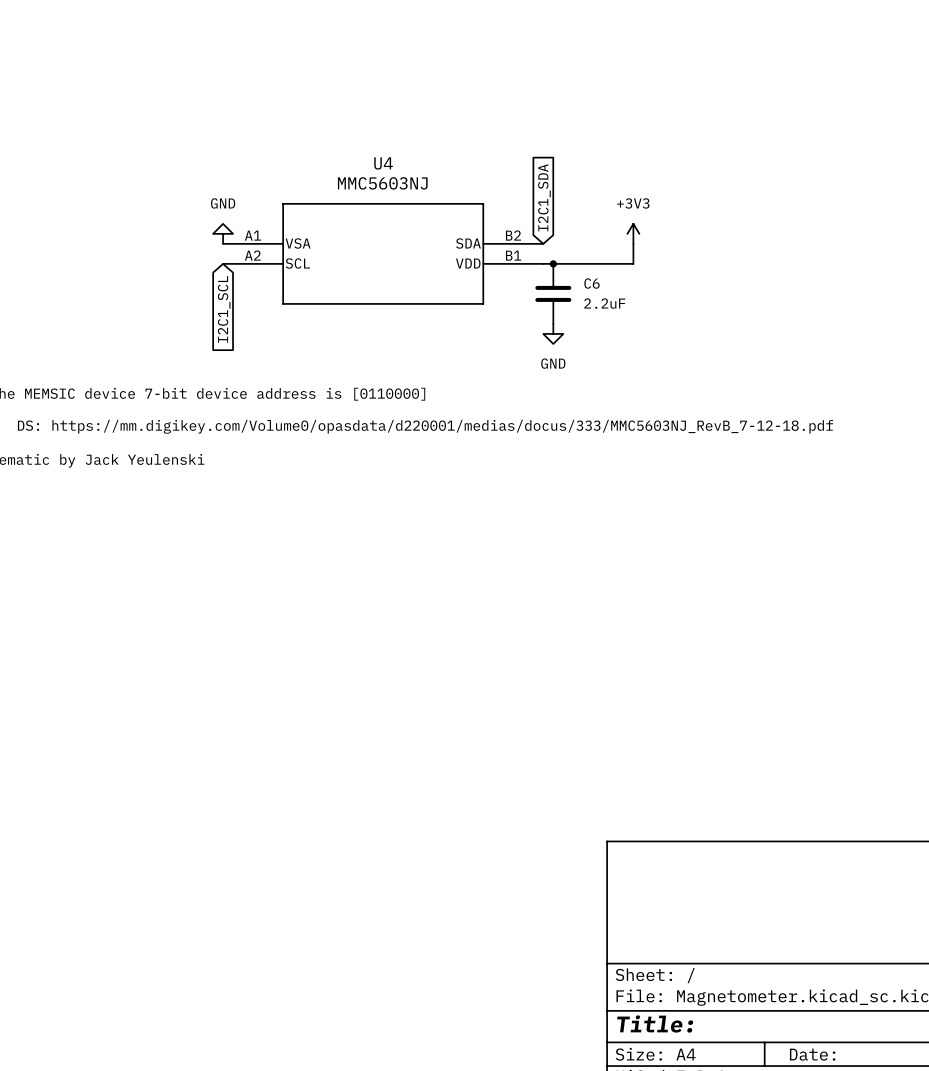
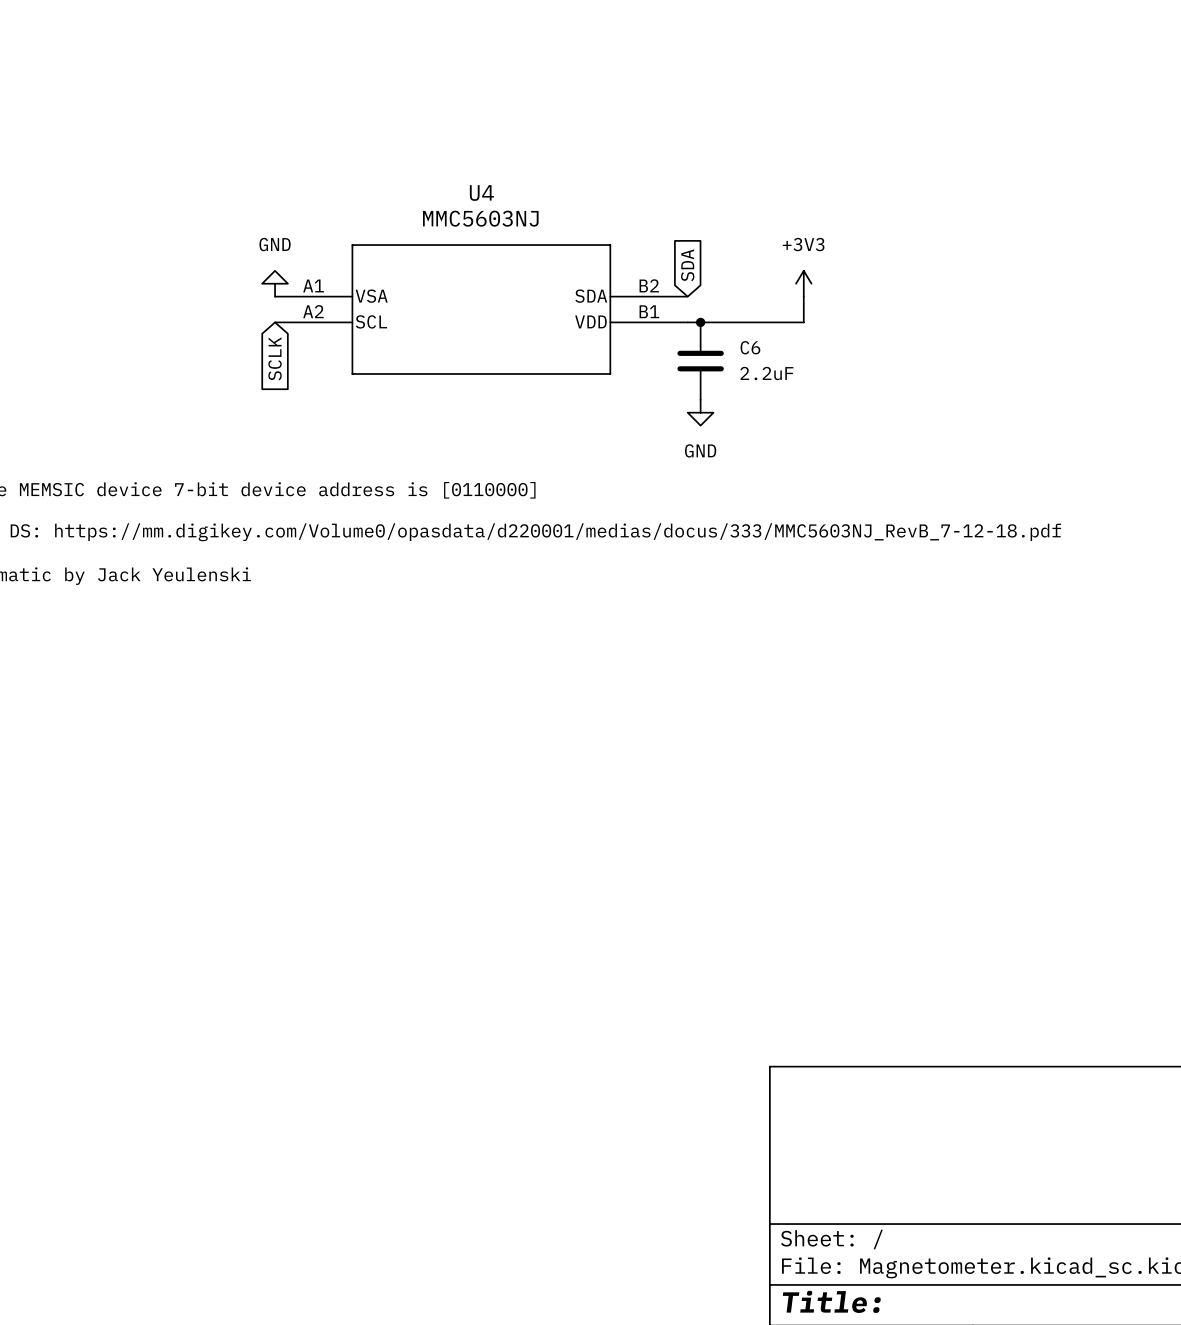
global label: I2C1_SDA (544, 197) -> SDA (687, 265)
global label: I2C1_SCL (224, 309) -> SCLK (275, 358)

